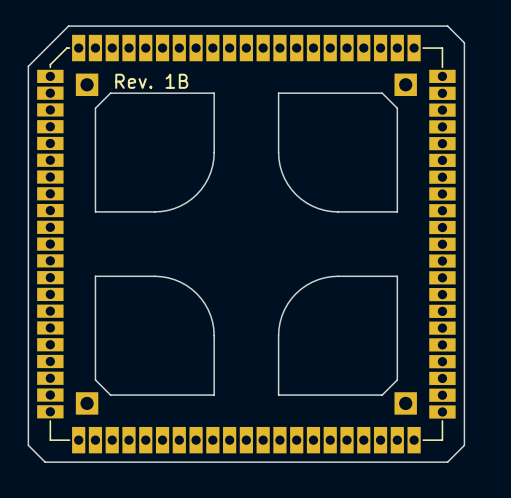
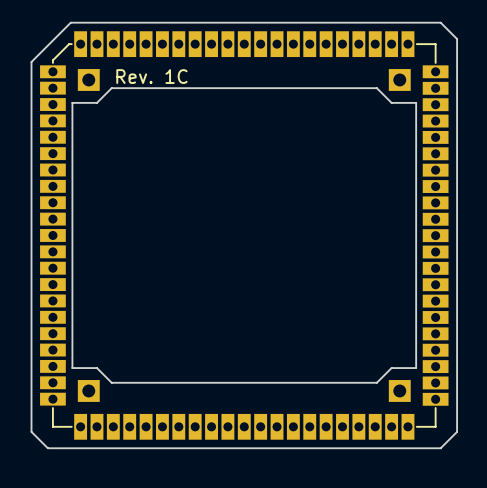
text: Rev. 1B (151, 81) -> Rev. 1C (151, 76)
board edge: (214, 93) (213, 159) (208, 178) (191, 198) (180, 206) (161, 211) (95, 211) (95, 108) -> (212, 88) (275, 88)
board edge: (278, 93) (278, 159) (284, 178) (300, 198) (312, 206) (331, 211) (397, 211) (397, 108) -> (391, 368) (416, 368) (416, 102) (391, 102)
board edge: none -> (96, 102) (72, 102) (72, 368) (96, 368)
board edge: (95, 379) (95, 276) (161, 276) (186, 285) (196, 293) (208, 309) (213, 329) (214, 395) -> (275, 382) (212, 382)
board edge: (397, 379) (397, 276) (331, 276) (306, 285) (295, 293) (284, 309) (278, 329) (278, 395) -> none

